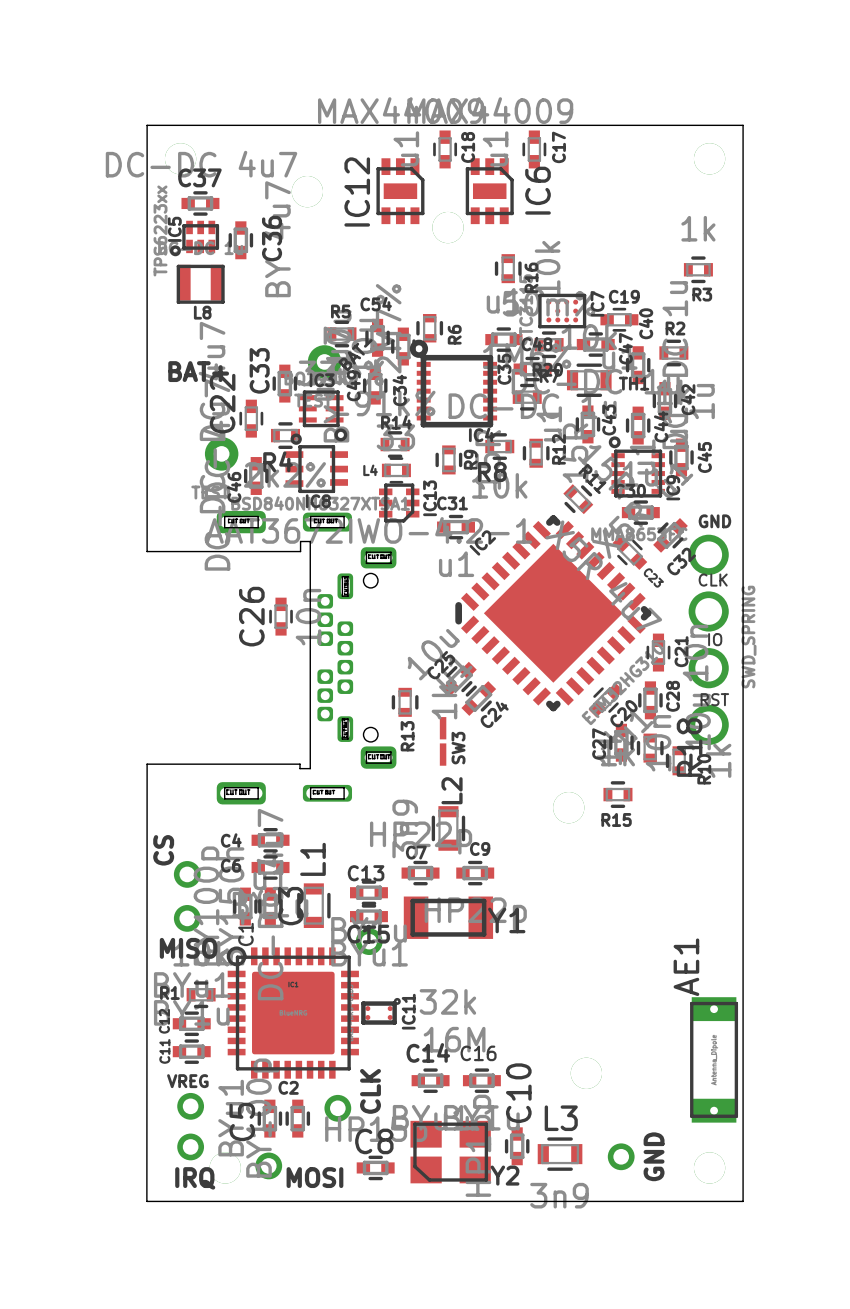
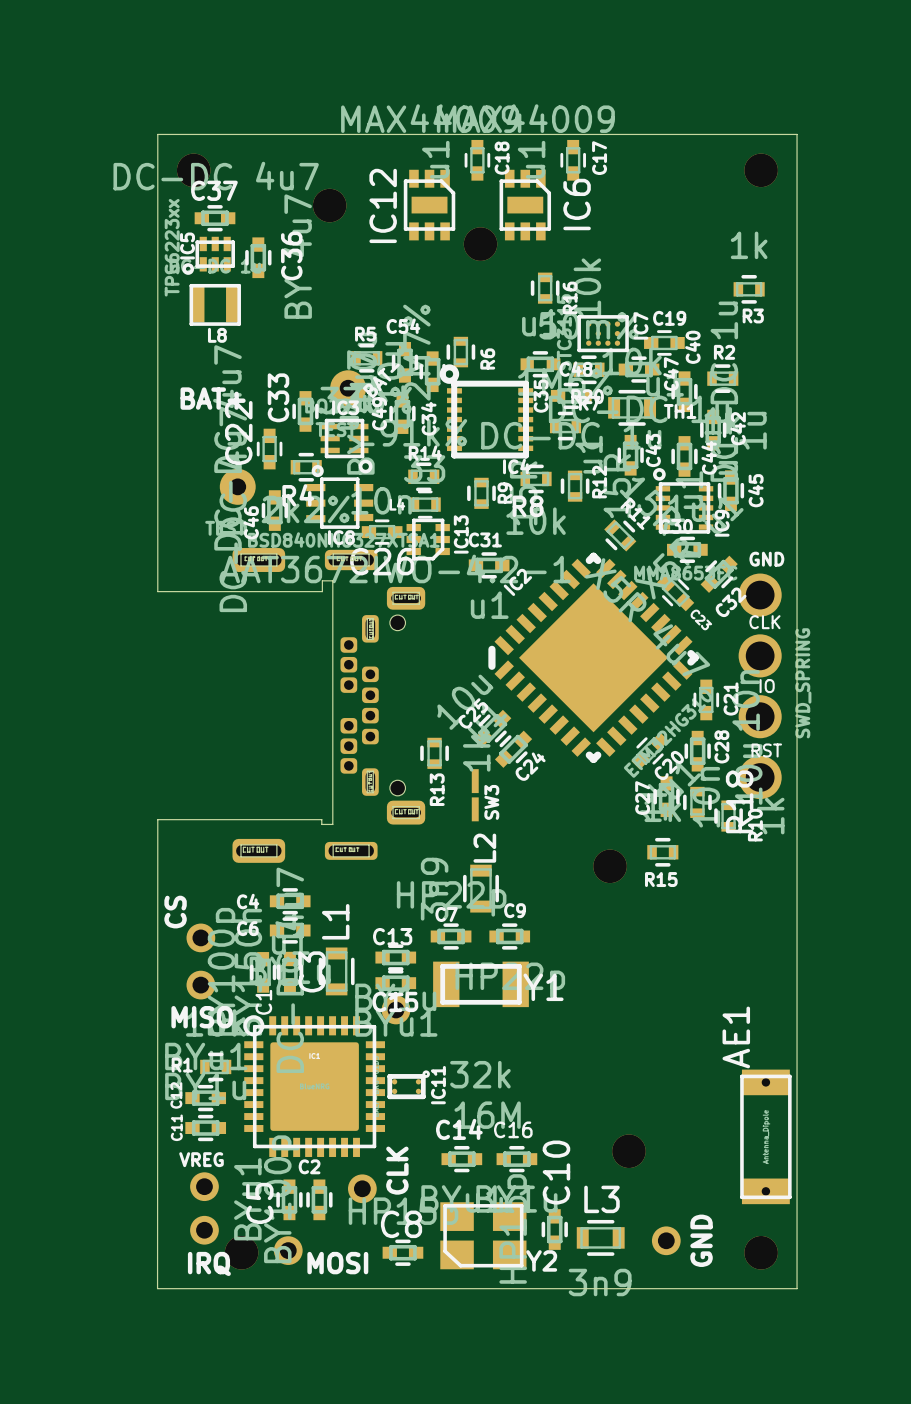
C26 rotation: 0° (281, 616) -> 90° clockwise (382, 532)
C26 position: (281, 616) -> (382, 532)

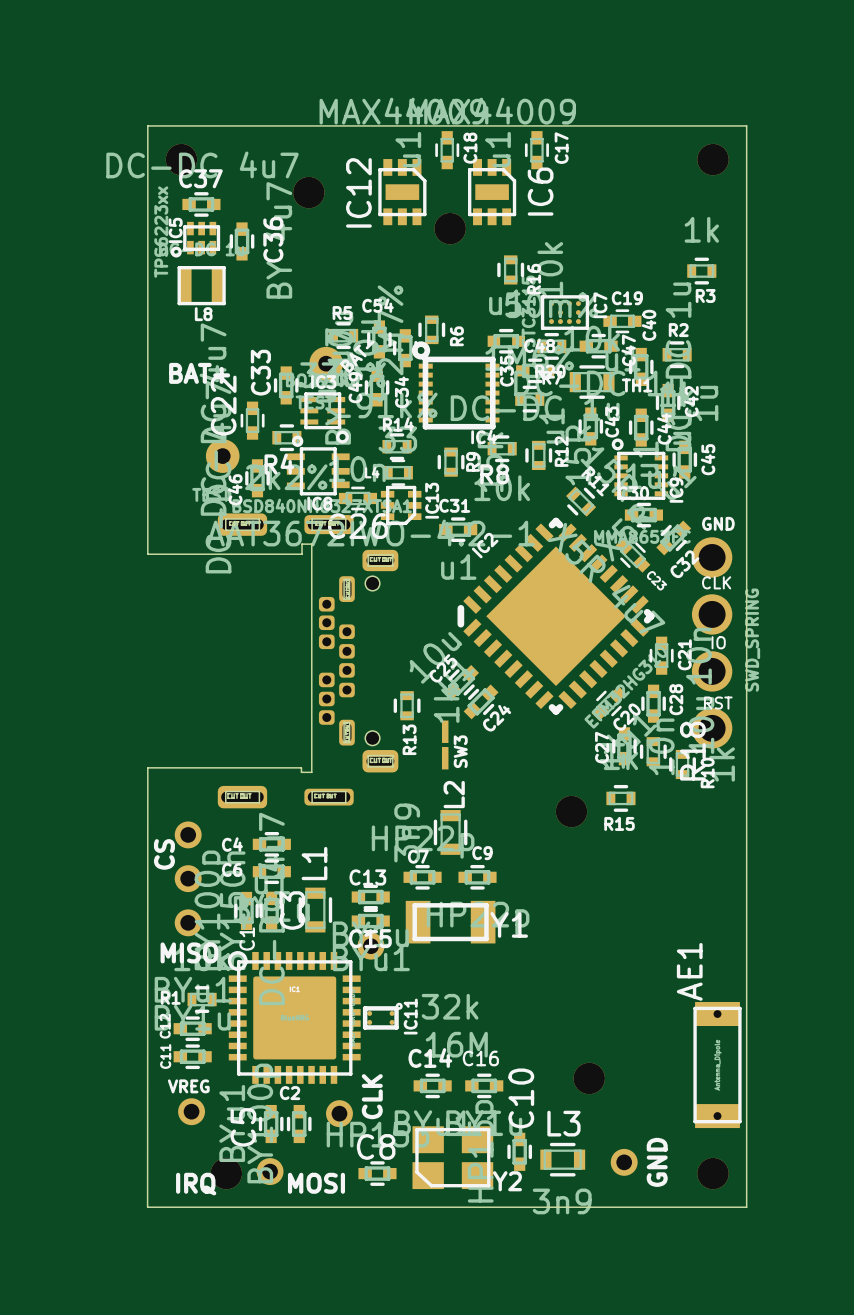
part position: (204, 1230) -> (188, 834)

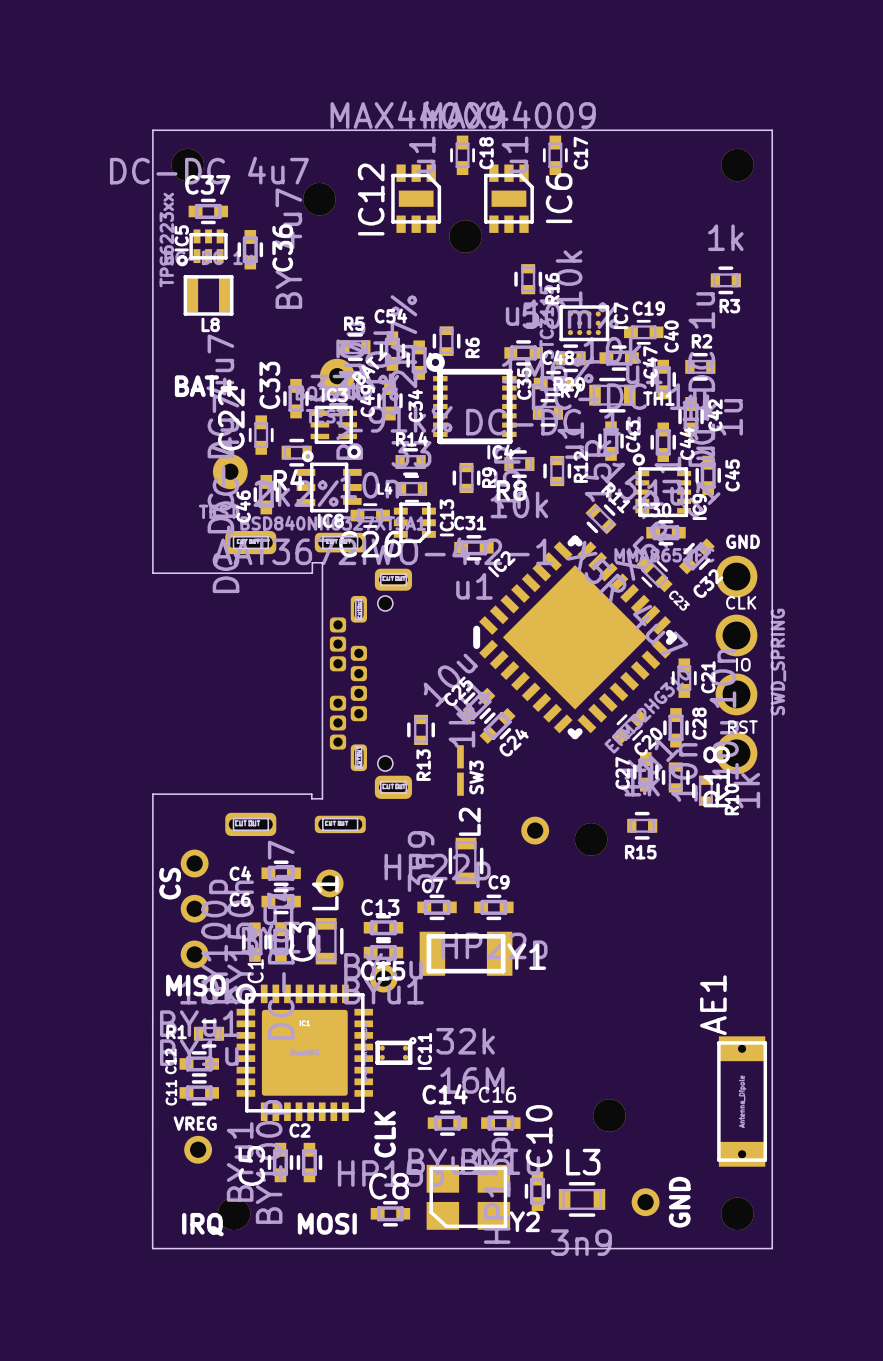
part: none -> (535, 830)
part: none -> (329, 883)
part: (339, 1113) -> none
part: (270, 1171) -> none

